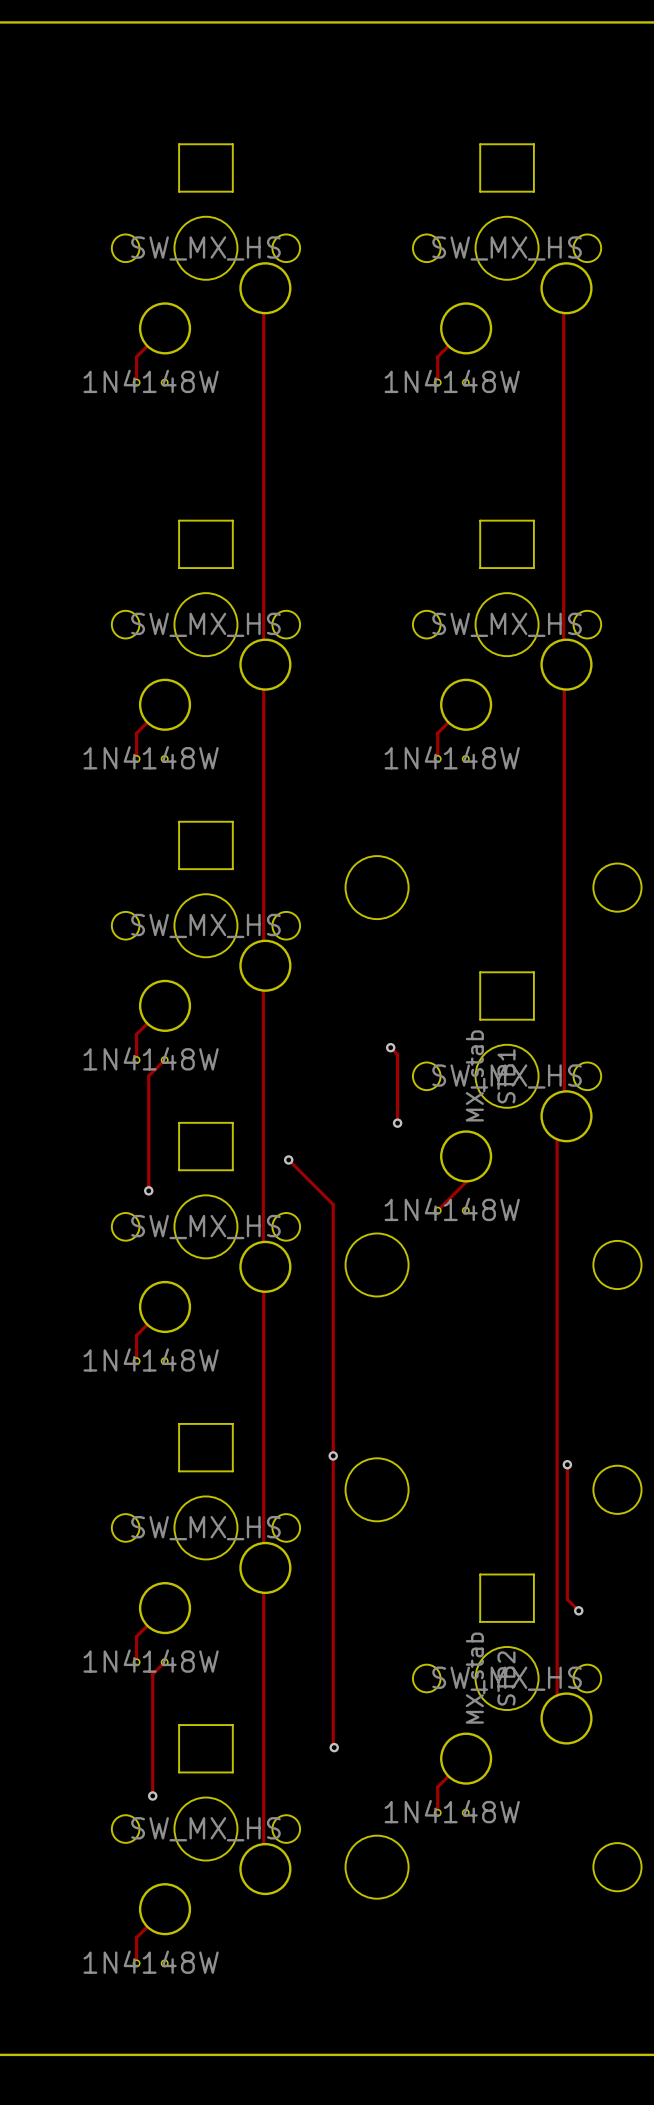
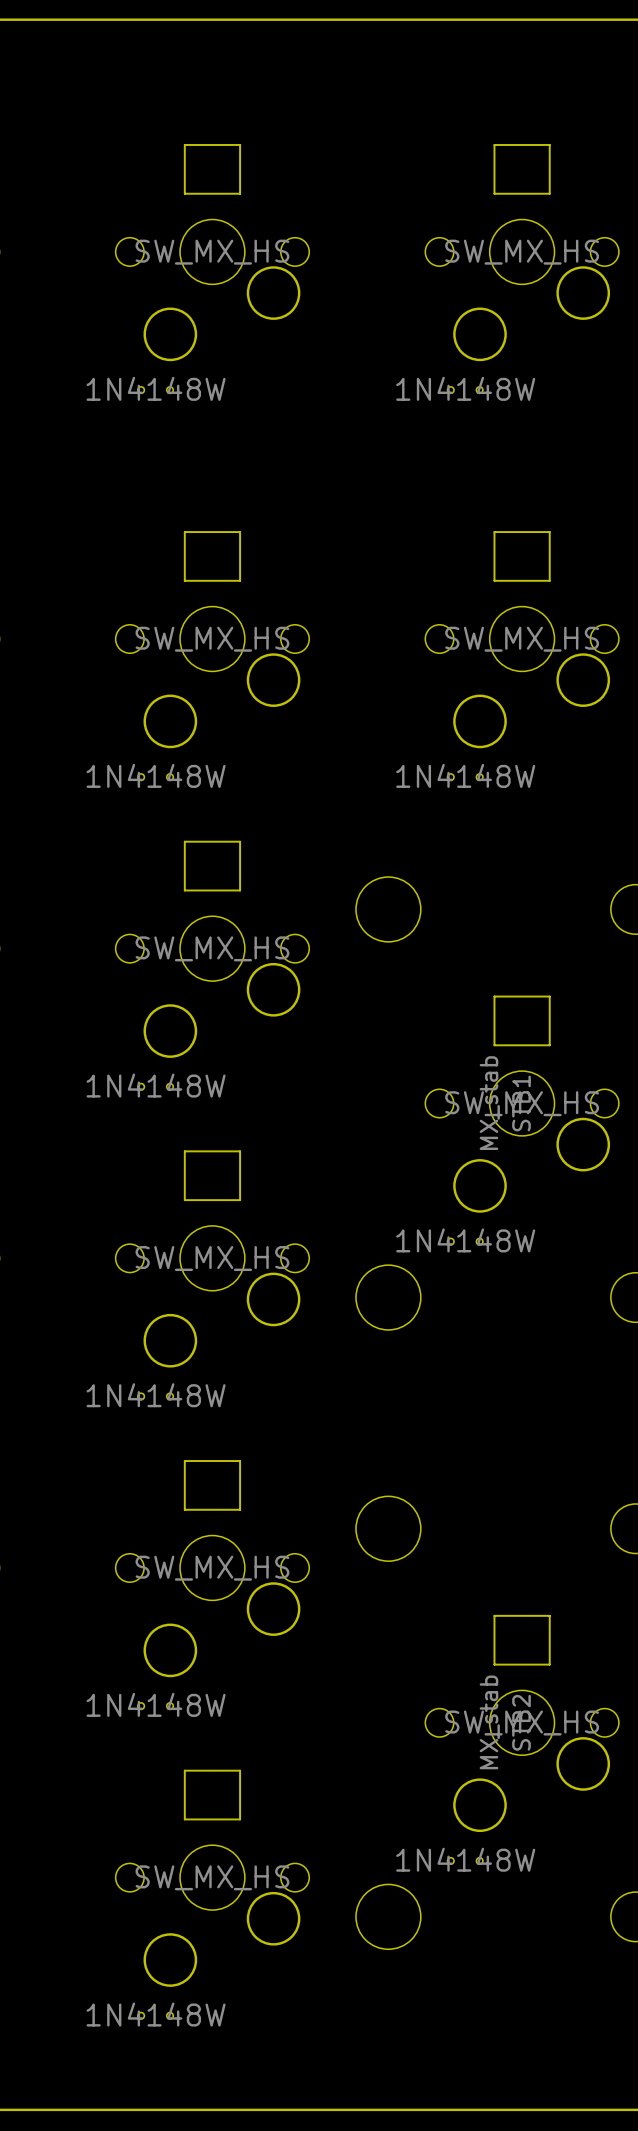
track: (265, 288) (263, 289) (263, 662) (265, 664) (263, 666) (263, 964) (265, 965) (263, 967) (263, 1264) (265, 1266) (263, 1268) (263, 1566) (265, 1567) (263, 1569) (263, 1867) (265, 1869) -> none
track: (566, 288) (563, 291) (563, 661) (566, 664) (564, 666) (564, 1114) (566, 1116) (557, 1125) (557, 1709) (566, 1718) -> none
track: (165, 328) (136, 356) (136, 382) -> none
track: (466, 328) (437, 356) (437, 382) -> none
track: (165, 704) (136, 733) (136, 758) -> none
track: (466, 704) (437, 733) (437, 758) -> none
track: (165, 1005) (136, 1034) (136, 1060) -> none
track: (390, 1047) (397, 1054) (397, 1123) -> none
via: (390, 1047) -> none
track: (164, 1060) (148, 1076) (148, 1190) -> none
via: (397, 1123) -> none
track: (466, 1156) (466, 1182) (437, 1210) -> none
track: (288, 1159) (333, 1204) (334, 1747) -> none
via: (288, 1159) -> none
via: (148, 1190) -> none
track: (165, 1306) (136, 1335) (136, 1361) -> none
via: (333, 1455) -> none
track: (567, 1464) (567, 1599) (578, 1610) -> none
via: (567, 1464) -> none
track: (165, 1608) (136, 1636) (136, 1662) -> none
via: (578, 1610) -> none
track: (164, 1662) (152, 1674) (152, 1796) -> none
via: (334, 1747) -> none
track: (466, 1758) (437, 1787) (437, 1812) -> none
via: (152, 1796) -> none
track: (165, 1909) (136, 1937) (136, 1963) -> none

